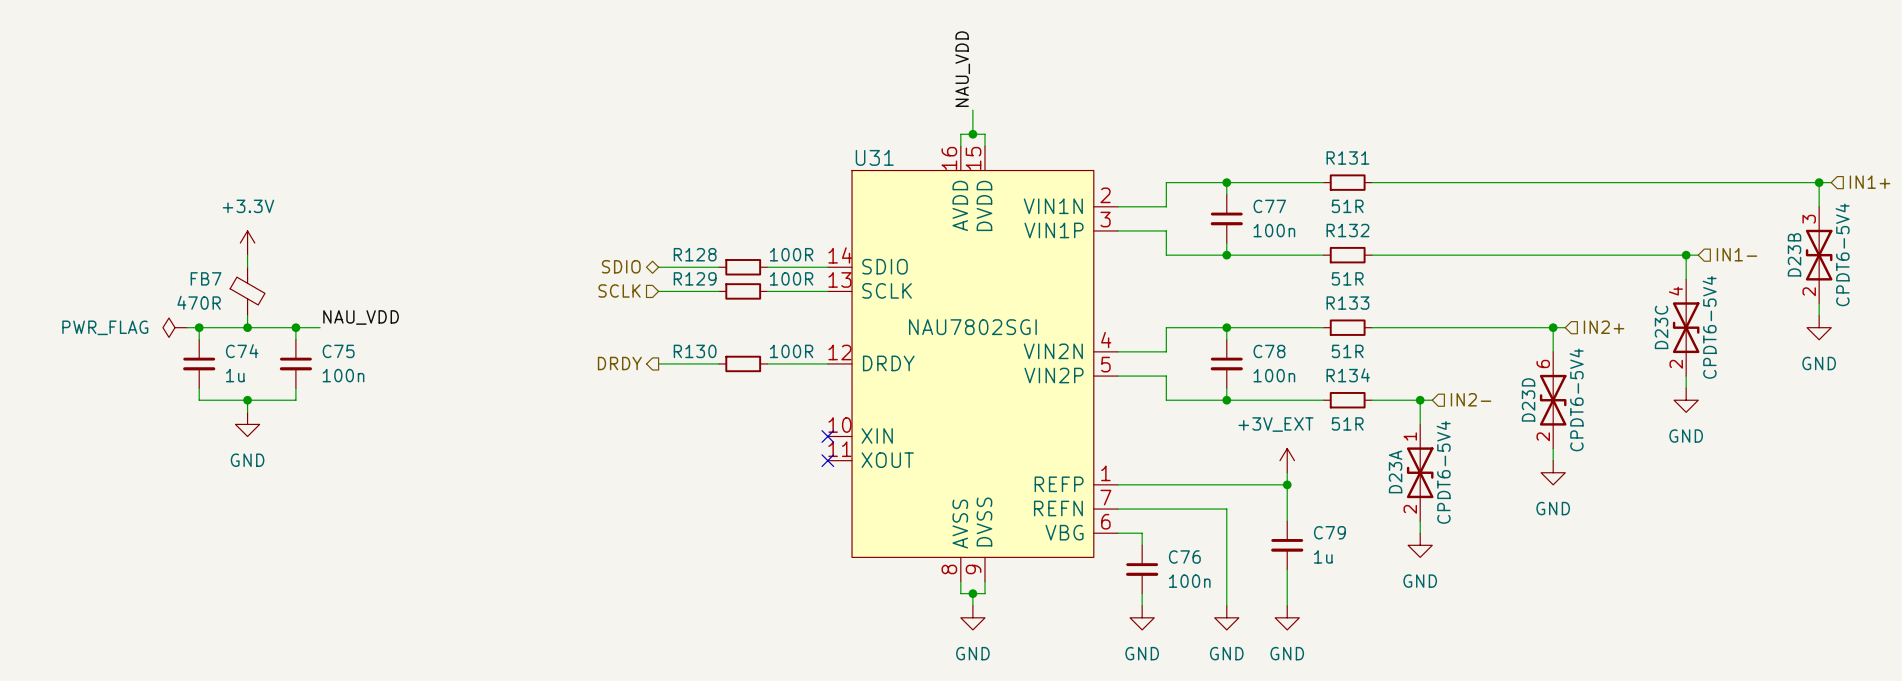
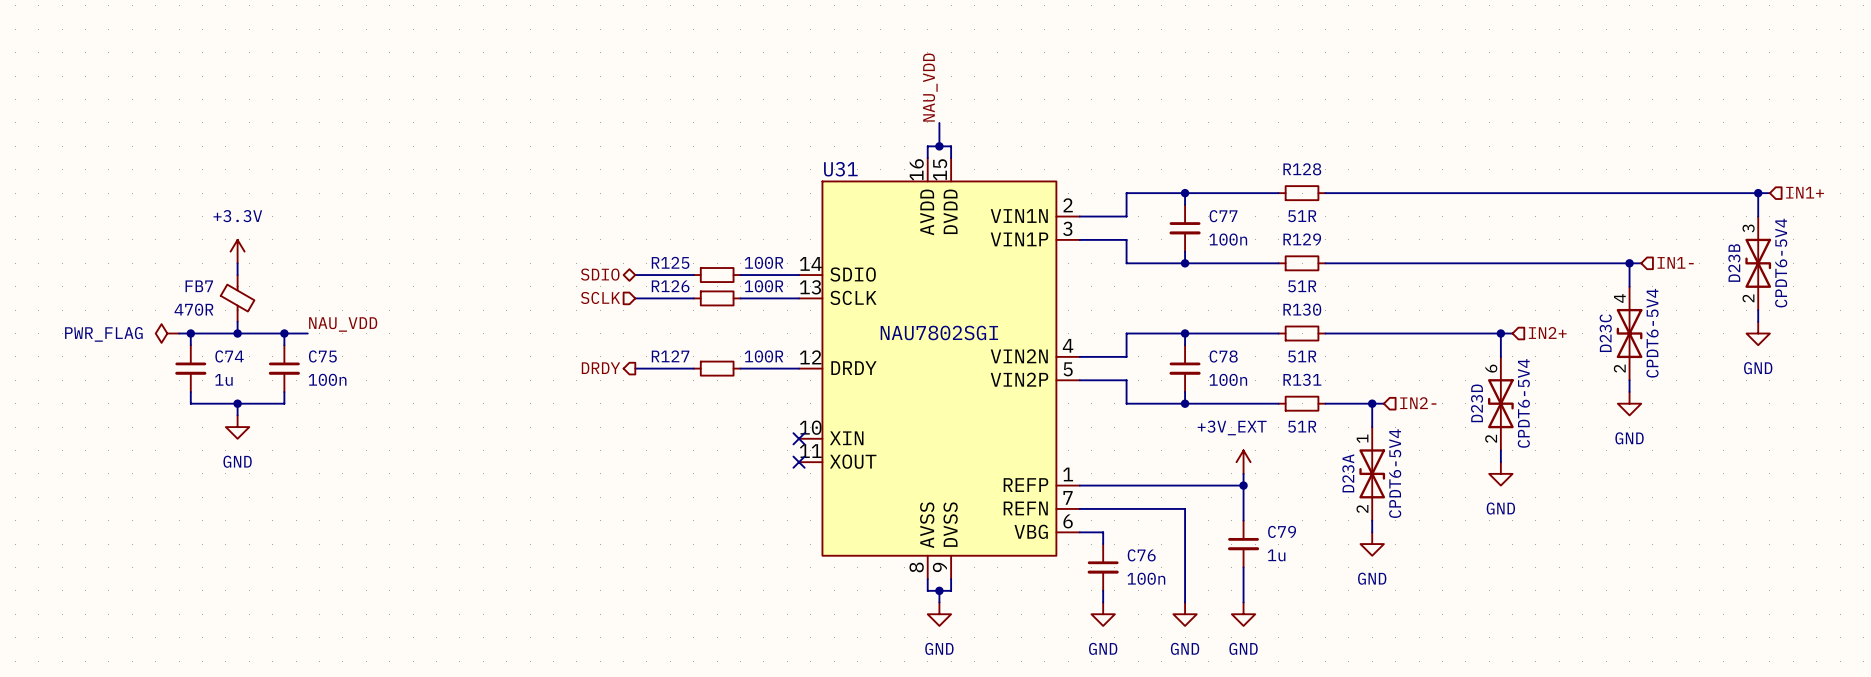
R131 name: R131 (1347, 157) -> R128 (1302, 169)
R132 name: R132 (1347, 230) -> R129 (1302, 239)
R128 name: R128 (695, 254) -> R125 (670, 262)
R129 name: R129 (695, 278) -> R126 (670, 286)
R133 name: R133 (1347, 303) -> R130 (1302, 309)
R130 name: R130 (695, 351) -> R127 (670, 356)
R134 name: R134 (1348, 375) -> R131 (1302, 379)

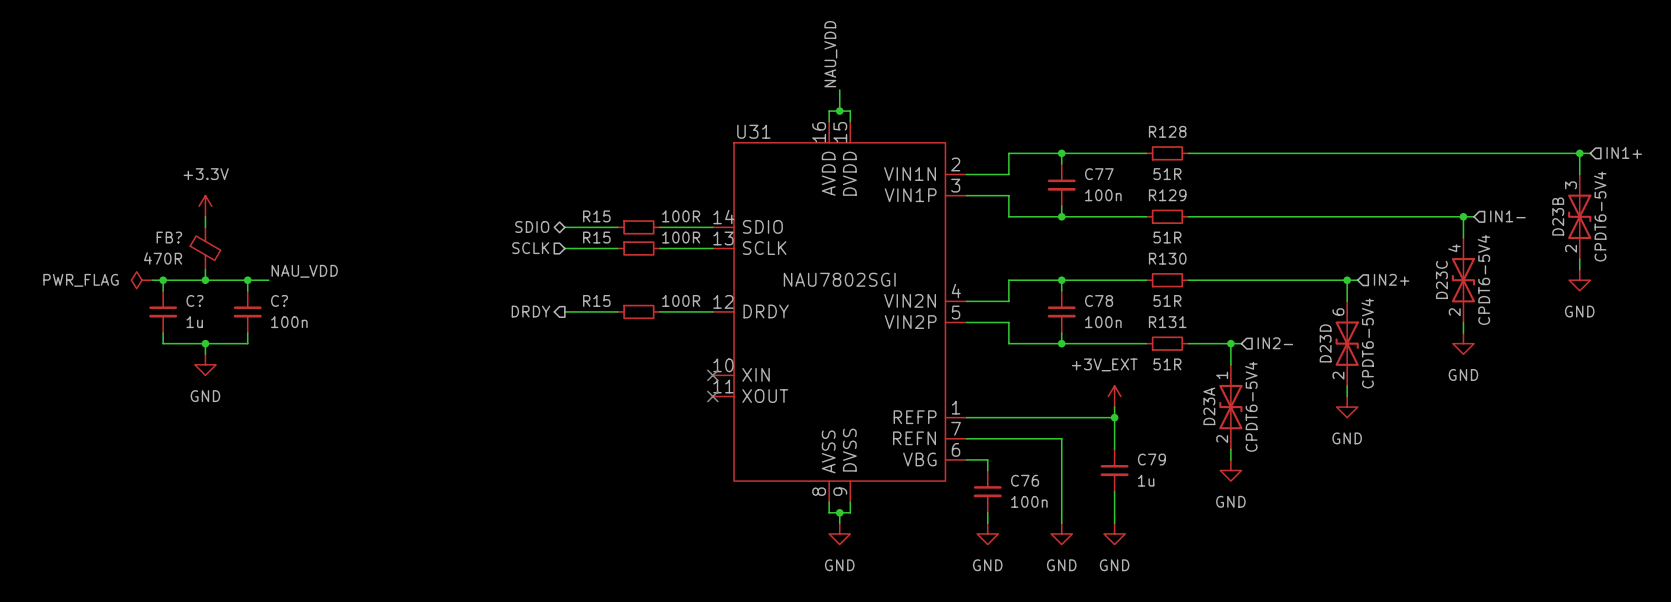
R125 name: R125 (670, 262) -> R15 (596, 216)
FB7 name: FB7 (199, 286) -> FB? (169, 237)
R126 name: R126 (670, 286) -> R15 (596, 237)
C74 name: C74 (229, 356) -> C? (194, 300)
C75 name: C75 (322, 356) -> C? (279, 300)
R127 name: R127 (670, 356) -> R15 (596, 300)

